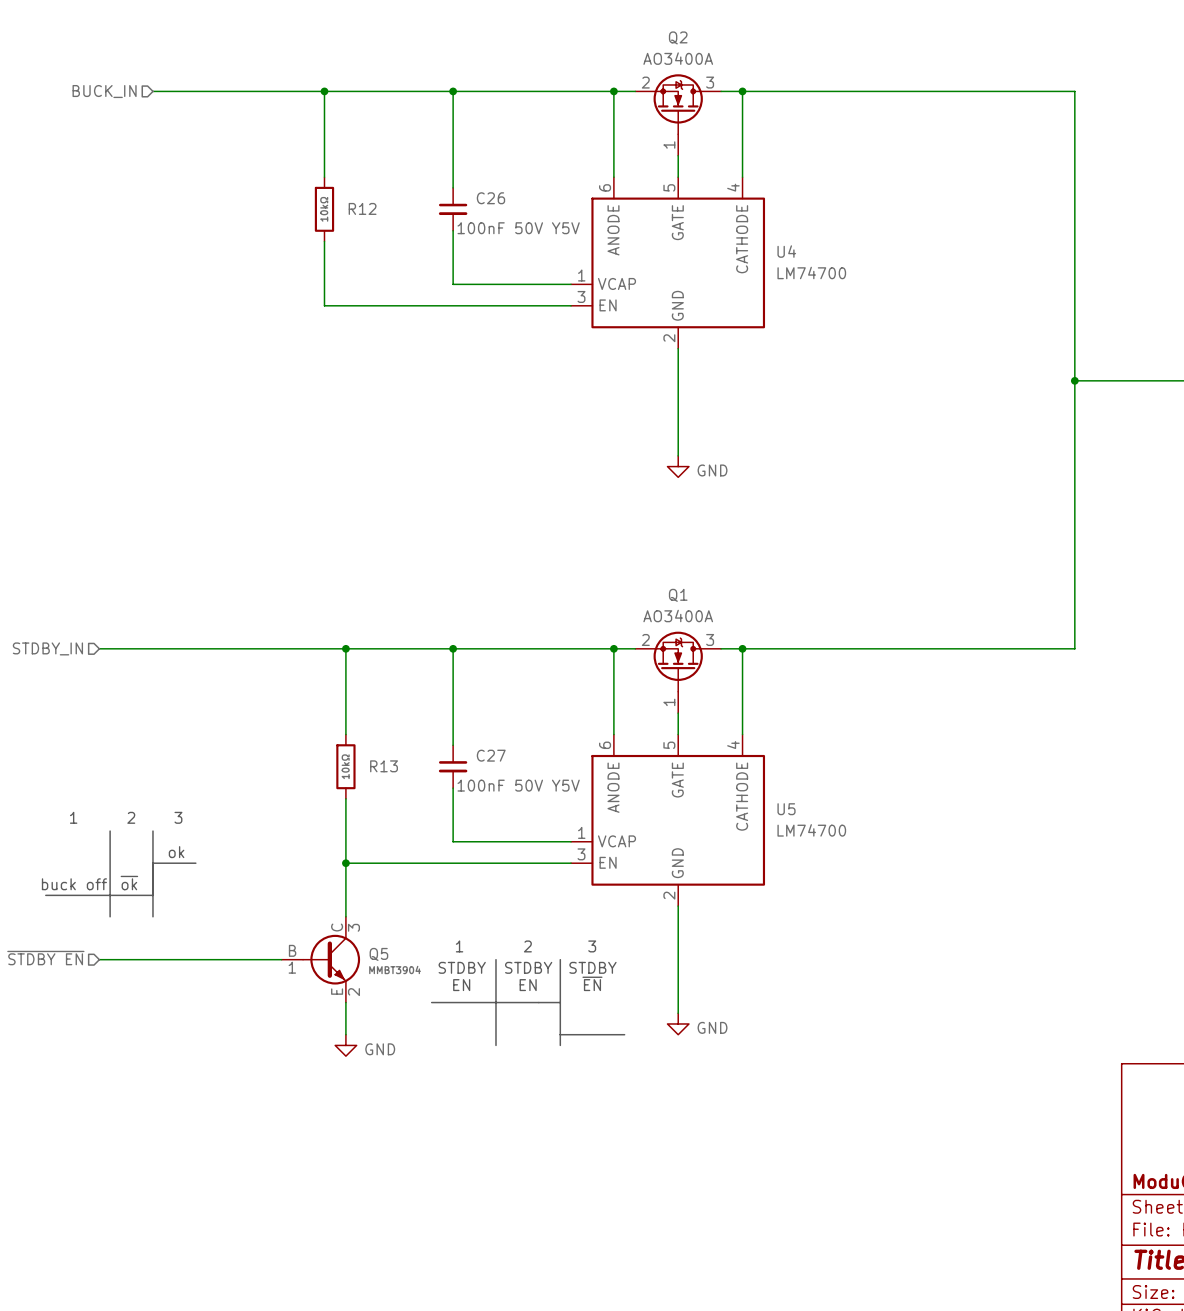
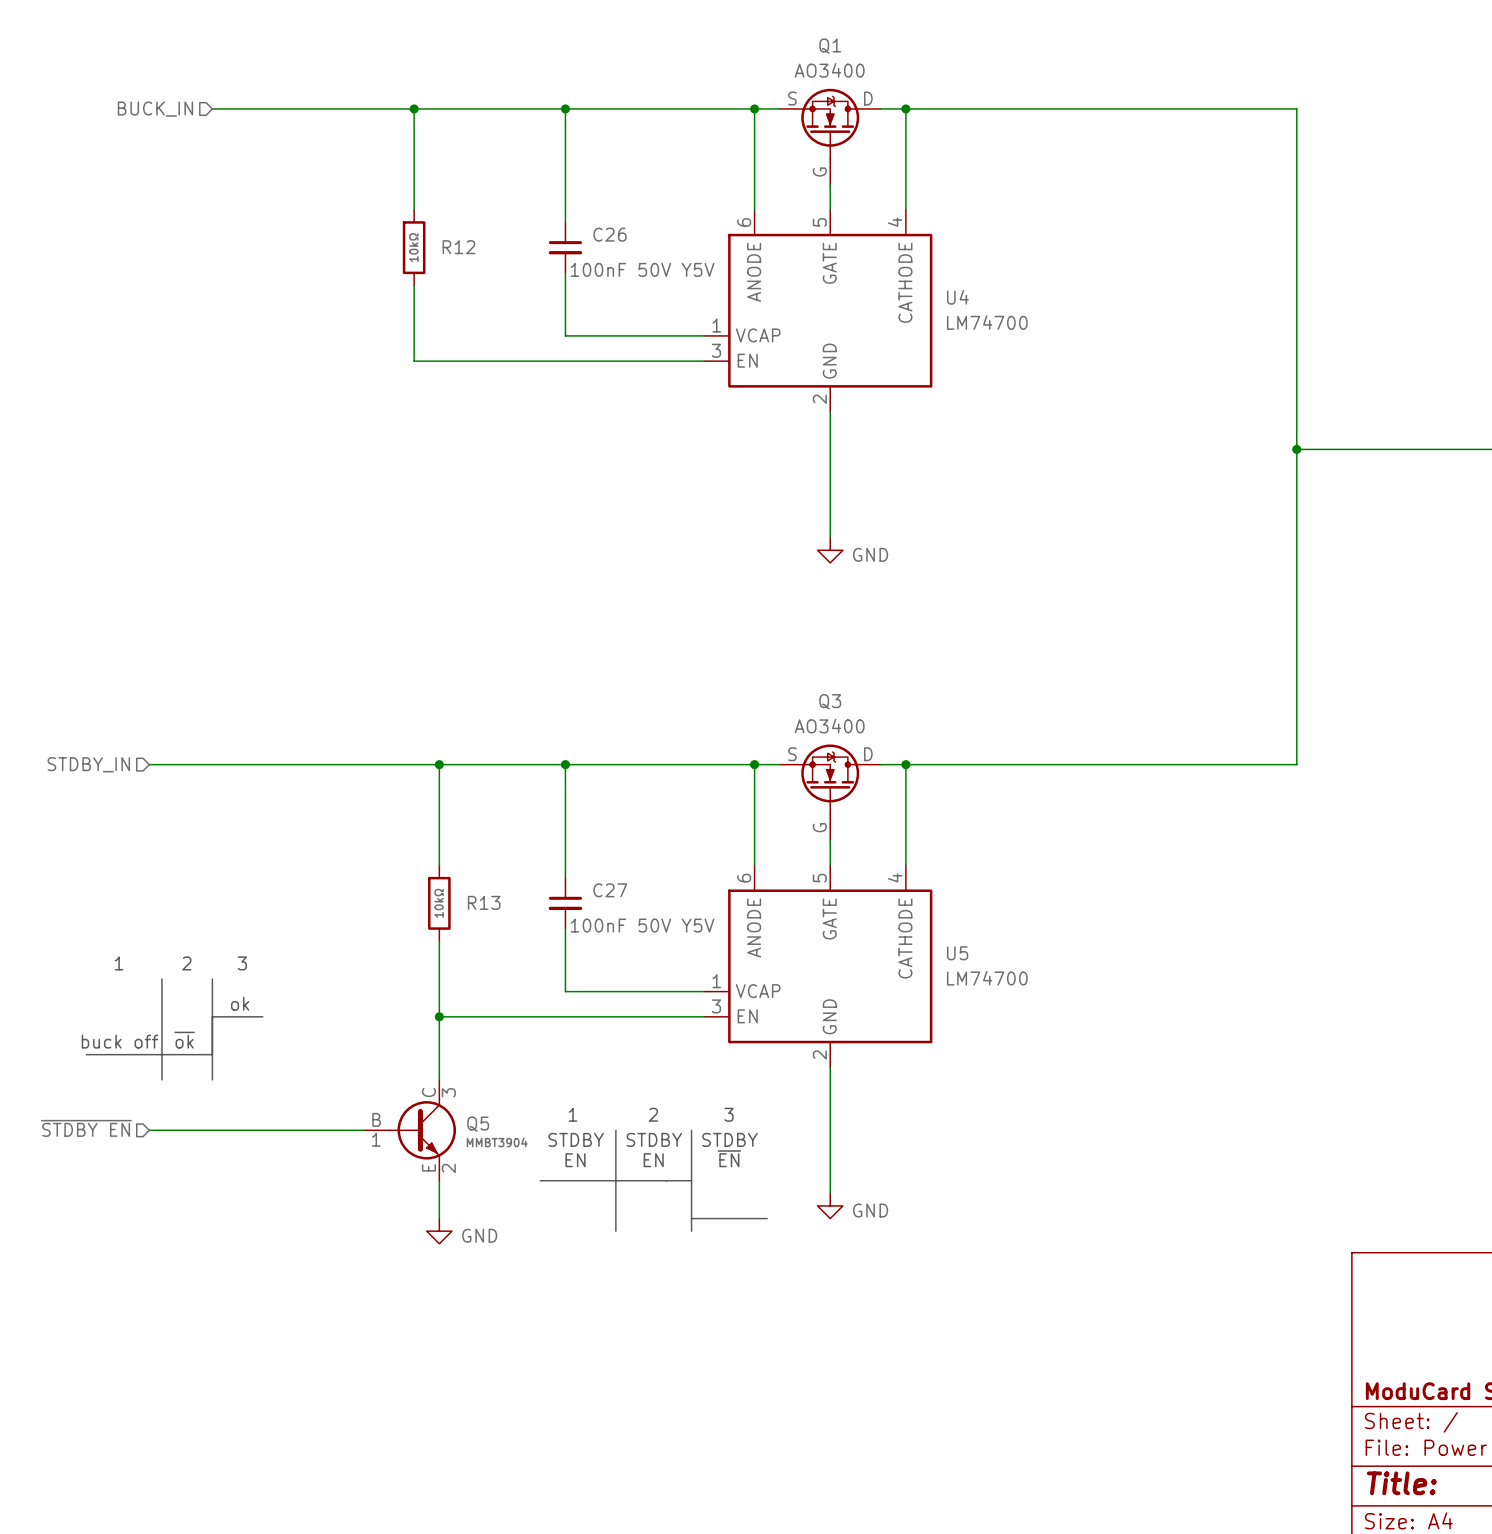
Q1 pin name: none -> S (792, 98)
Q1 pin name: none -> D (868, 98)
Q2: AO3400A (678, 115) -> none
Q1 pin name: none -> G (819, 172)
Q1 value: AO3400A (678, 616) -> AO3400 (829, 70)
Q1 pin number: 2 (645, 639) -> none
Q1 pin number: 3 (710, 639) -> none
Q1 position: (678, 672) -> (830, 136)
Q3: none -> AO3400 (830, 792)
Q1 pin number: 1 (669, 702) -> none

